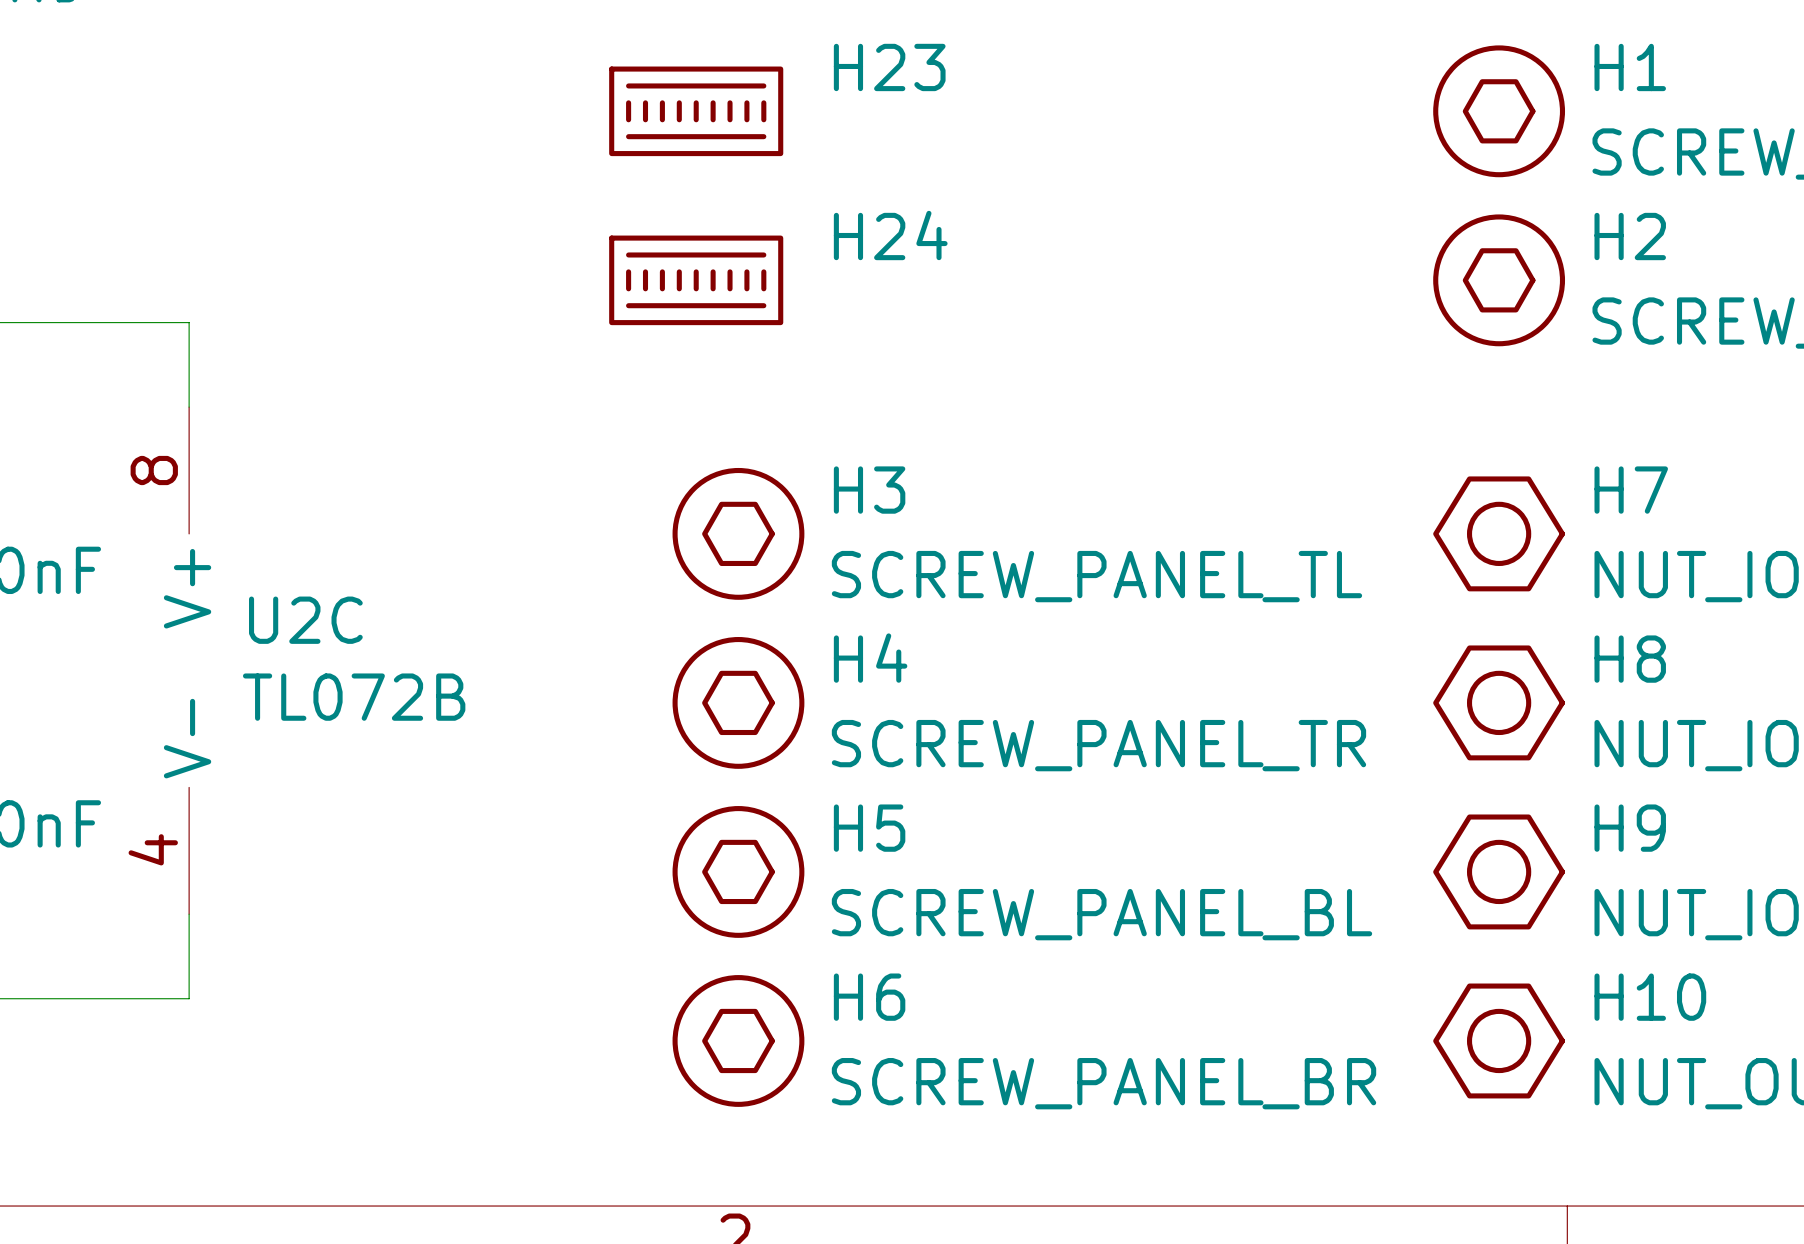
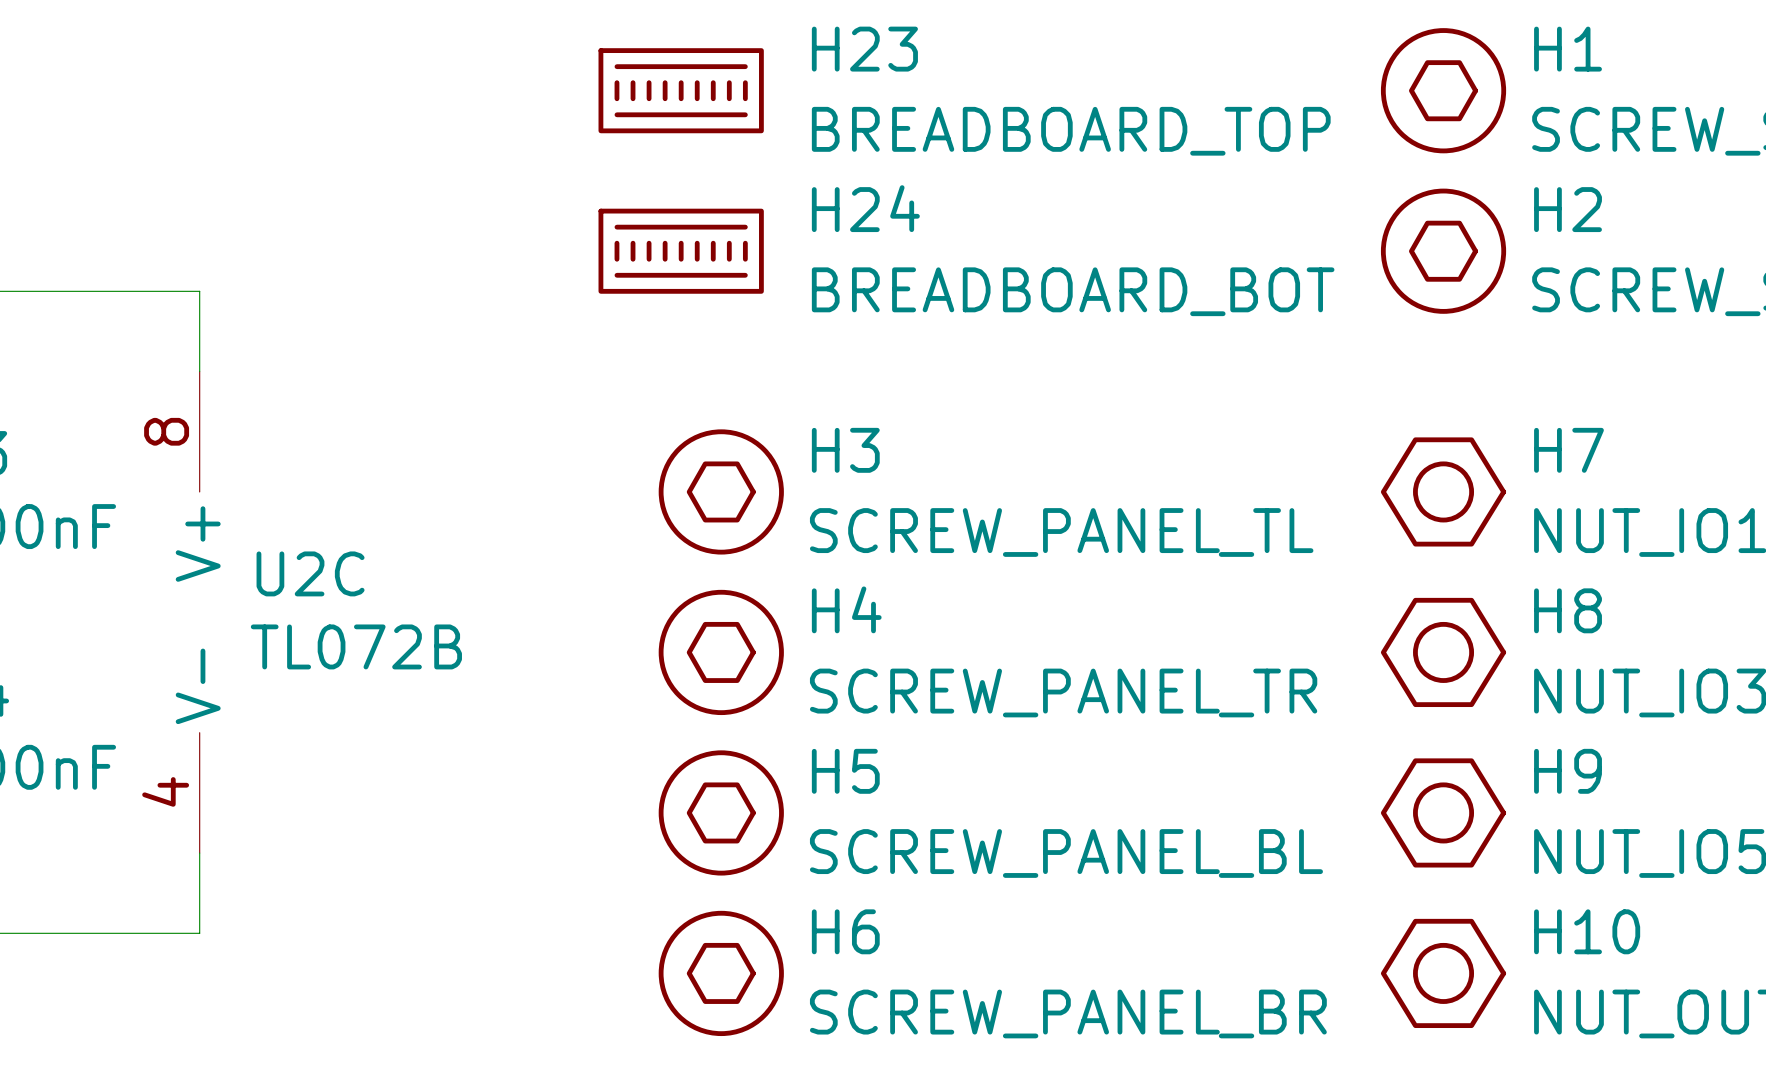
H23 value: none -> BREADBOARD_TOP (1071, 131)
H24 value: none -> BREADBOARD_BOT (1073, 291)

